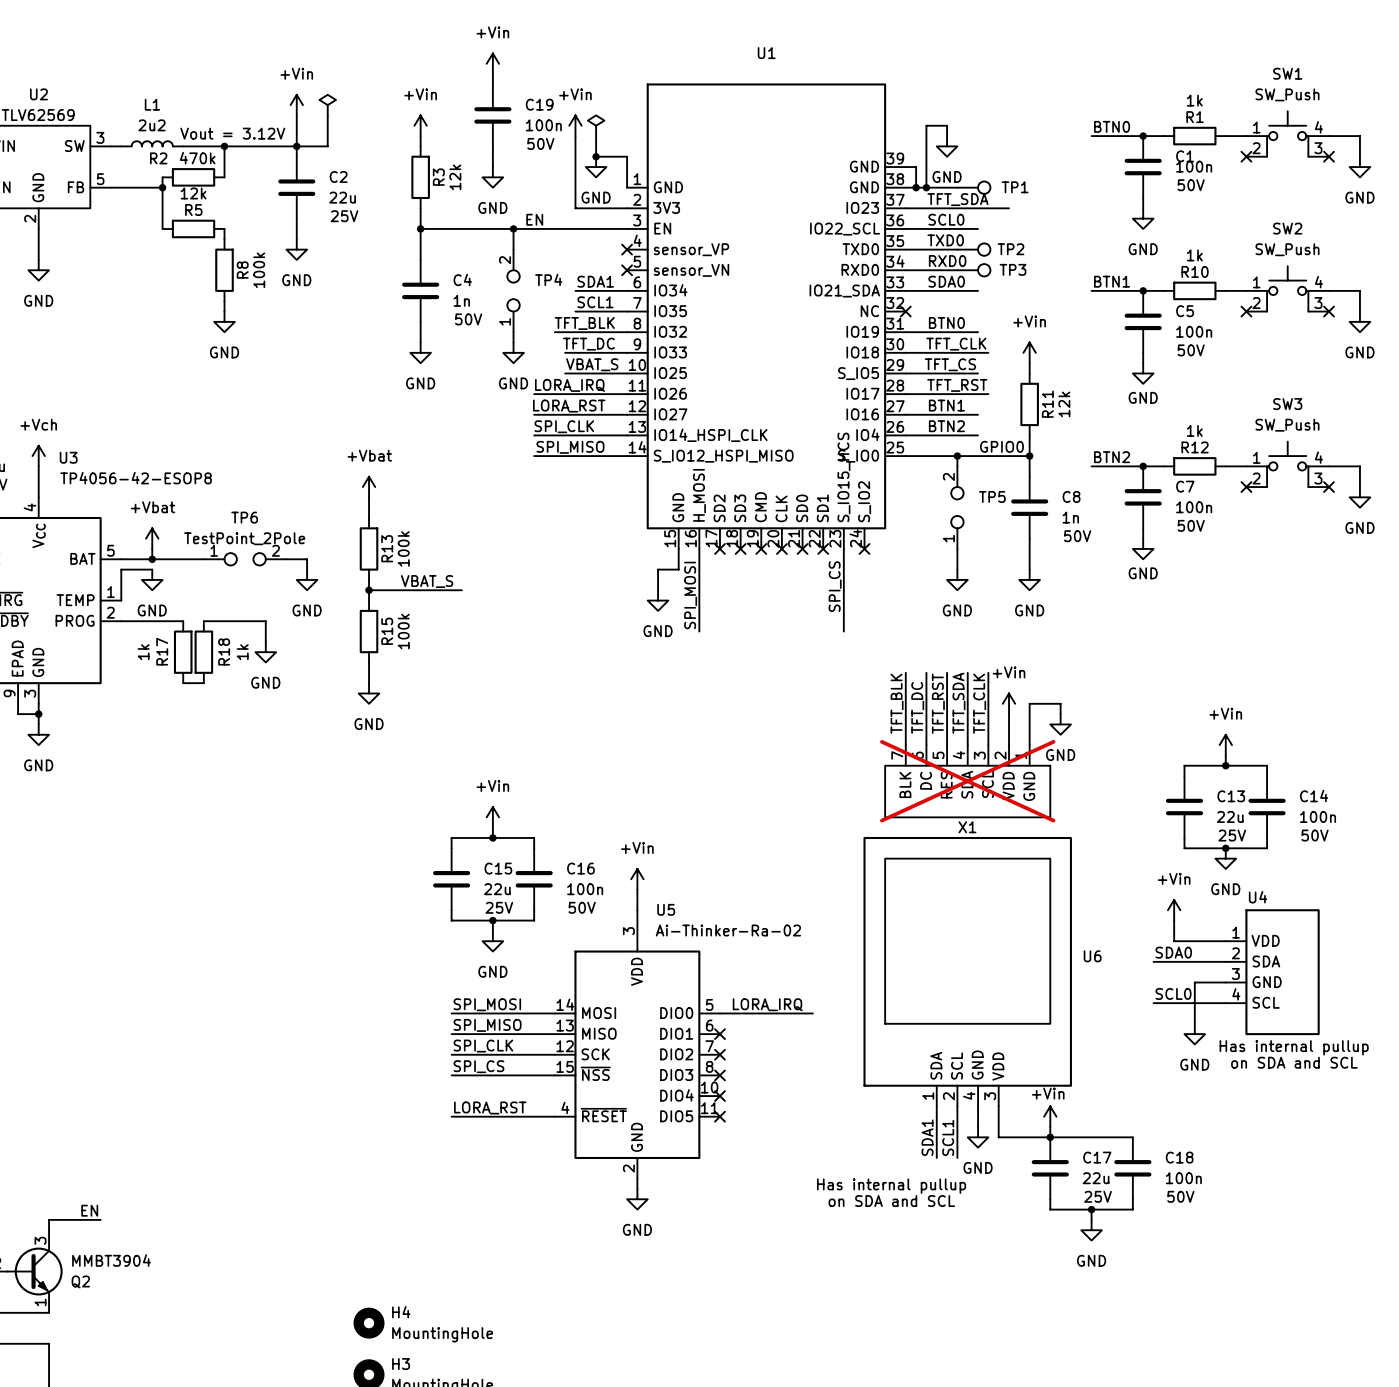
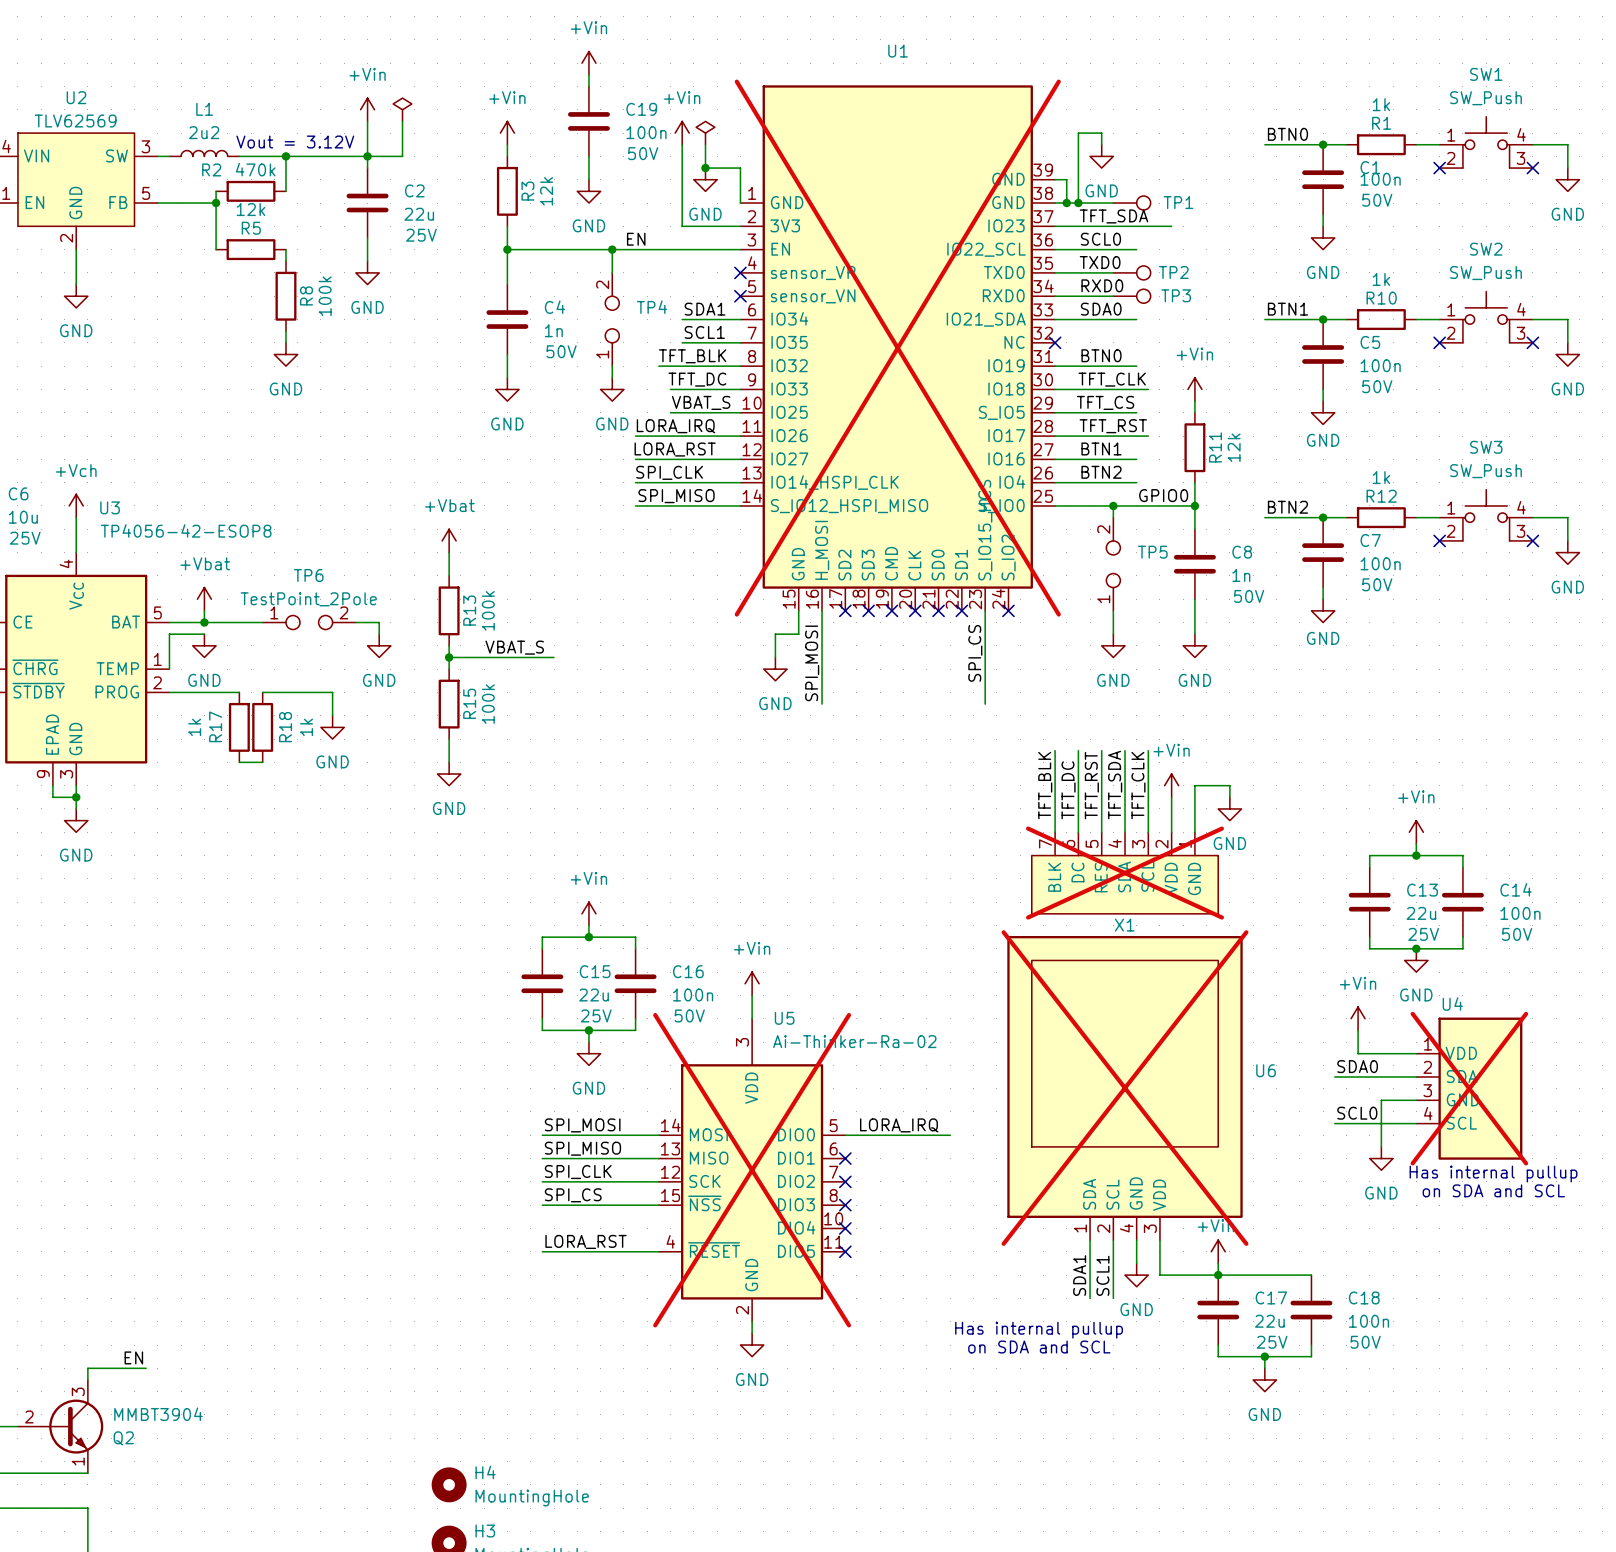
U1 do-not-place cross: none -> (897, 348)
U6 do-not-place cross: none -> (1125, 1088)
U4 do-not-place cross: none -> (1469, 1088)
U5 do-not-place cross: none -> (752, 1170)

